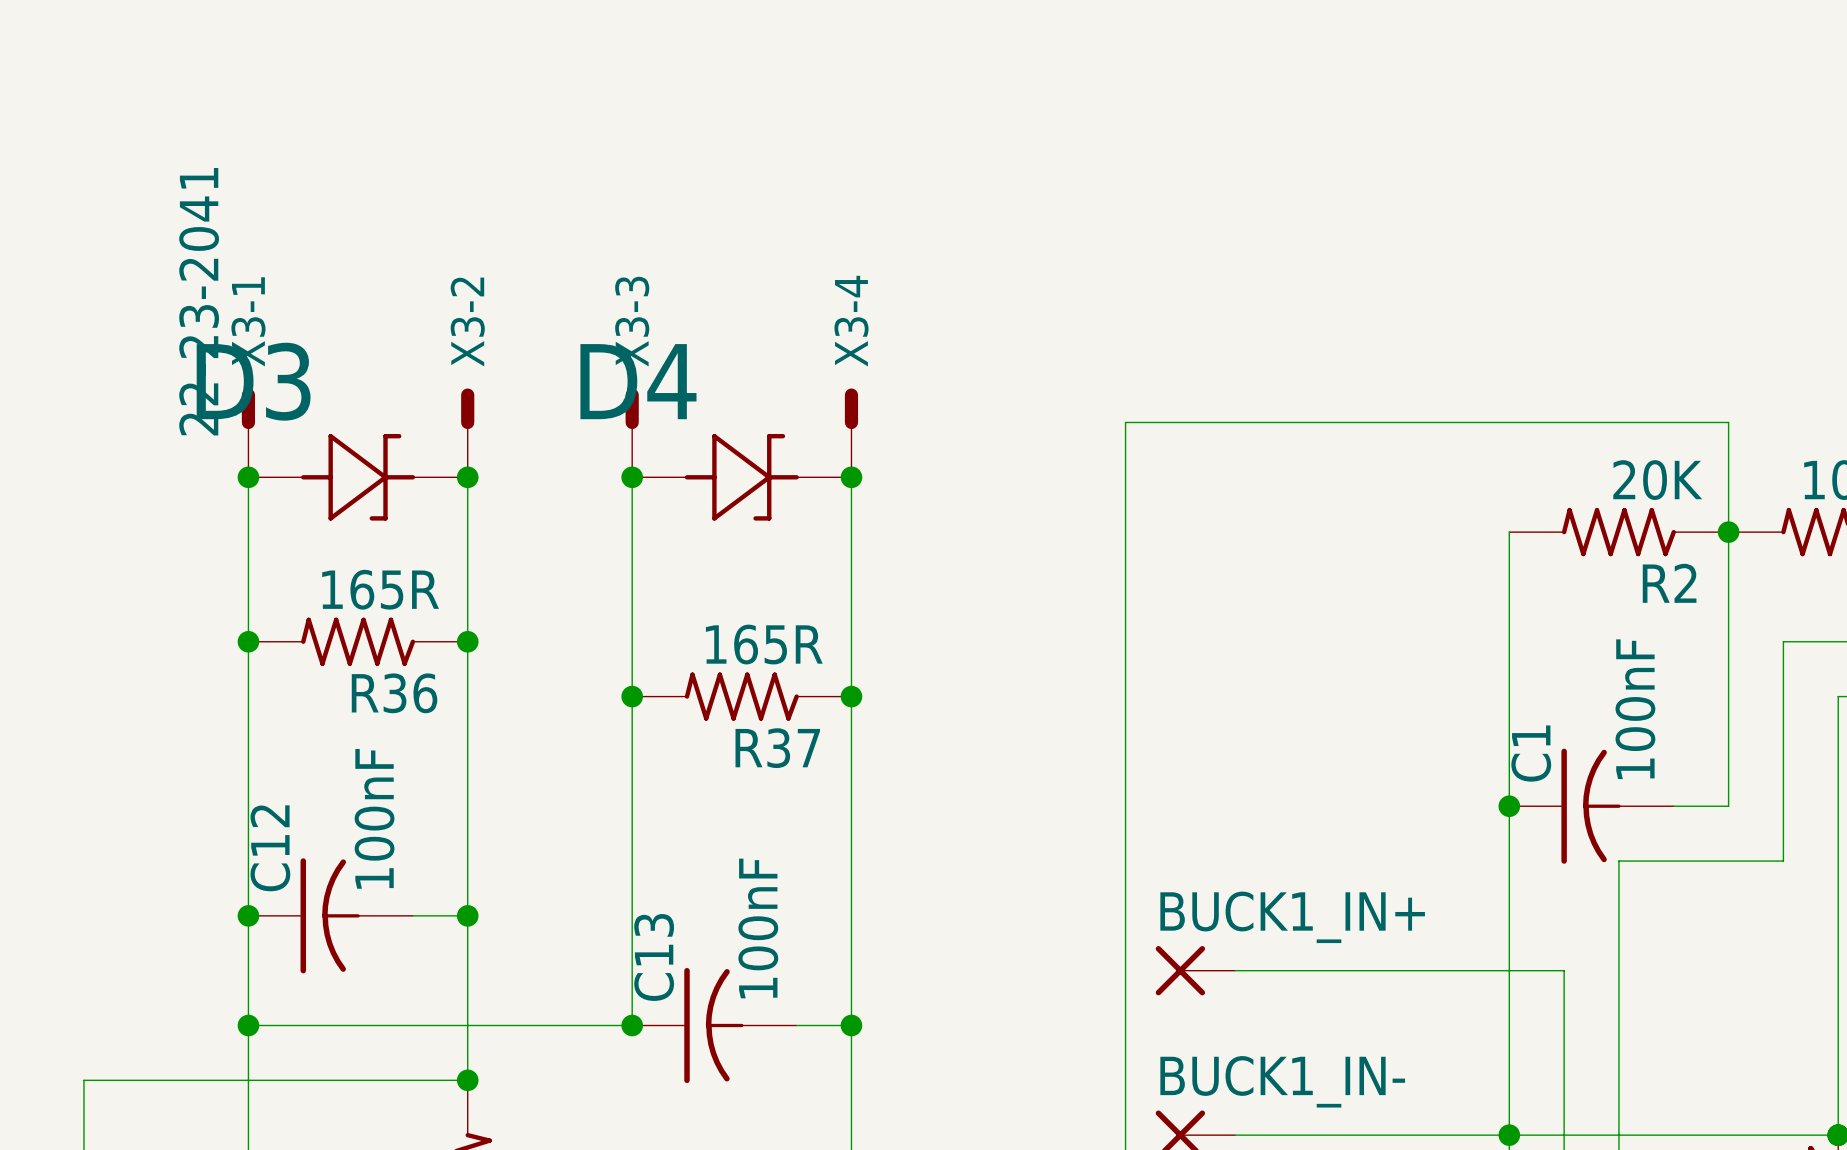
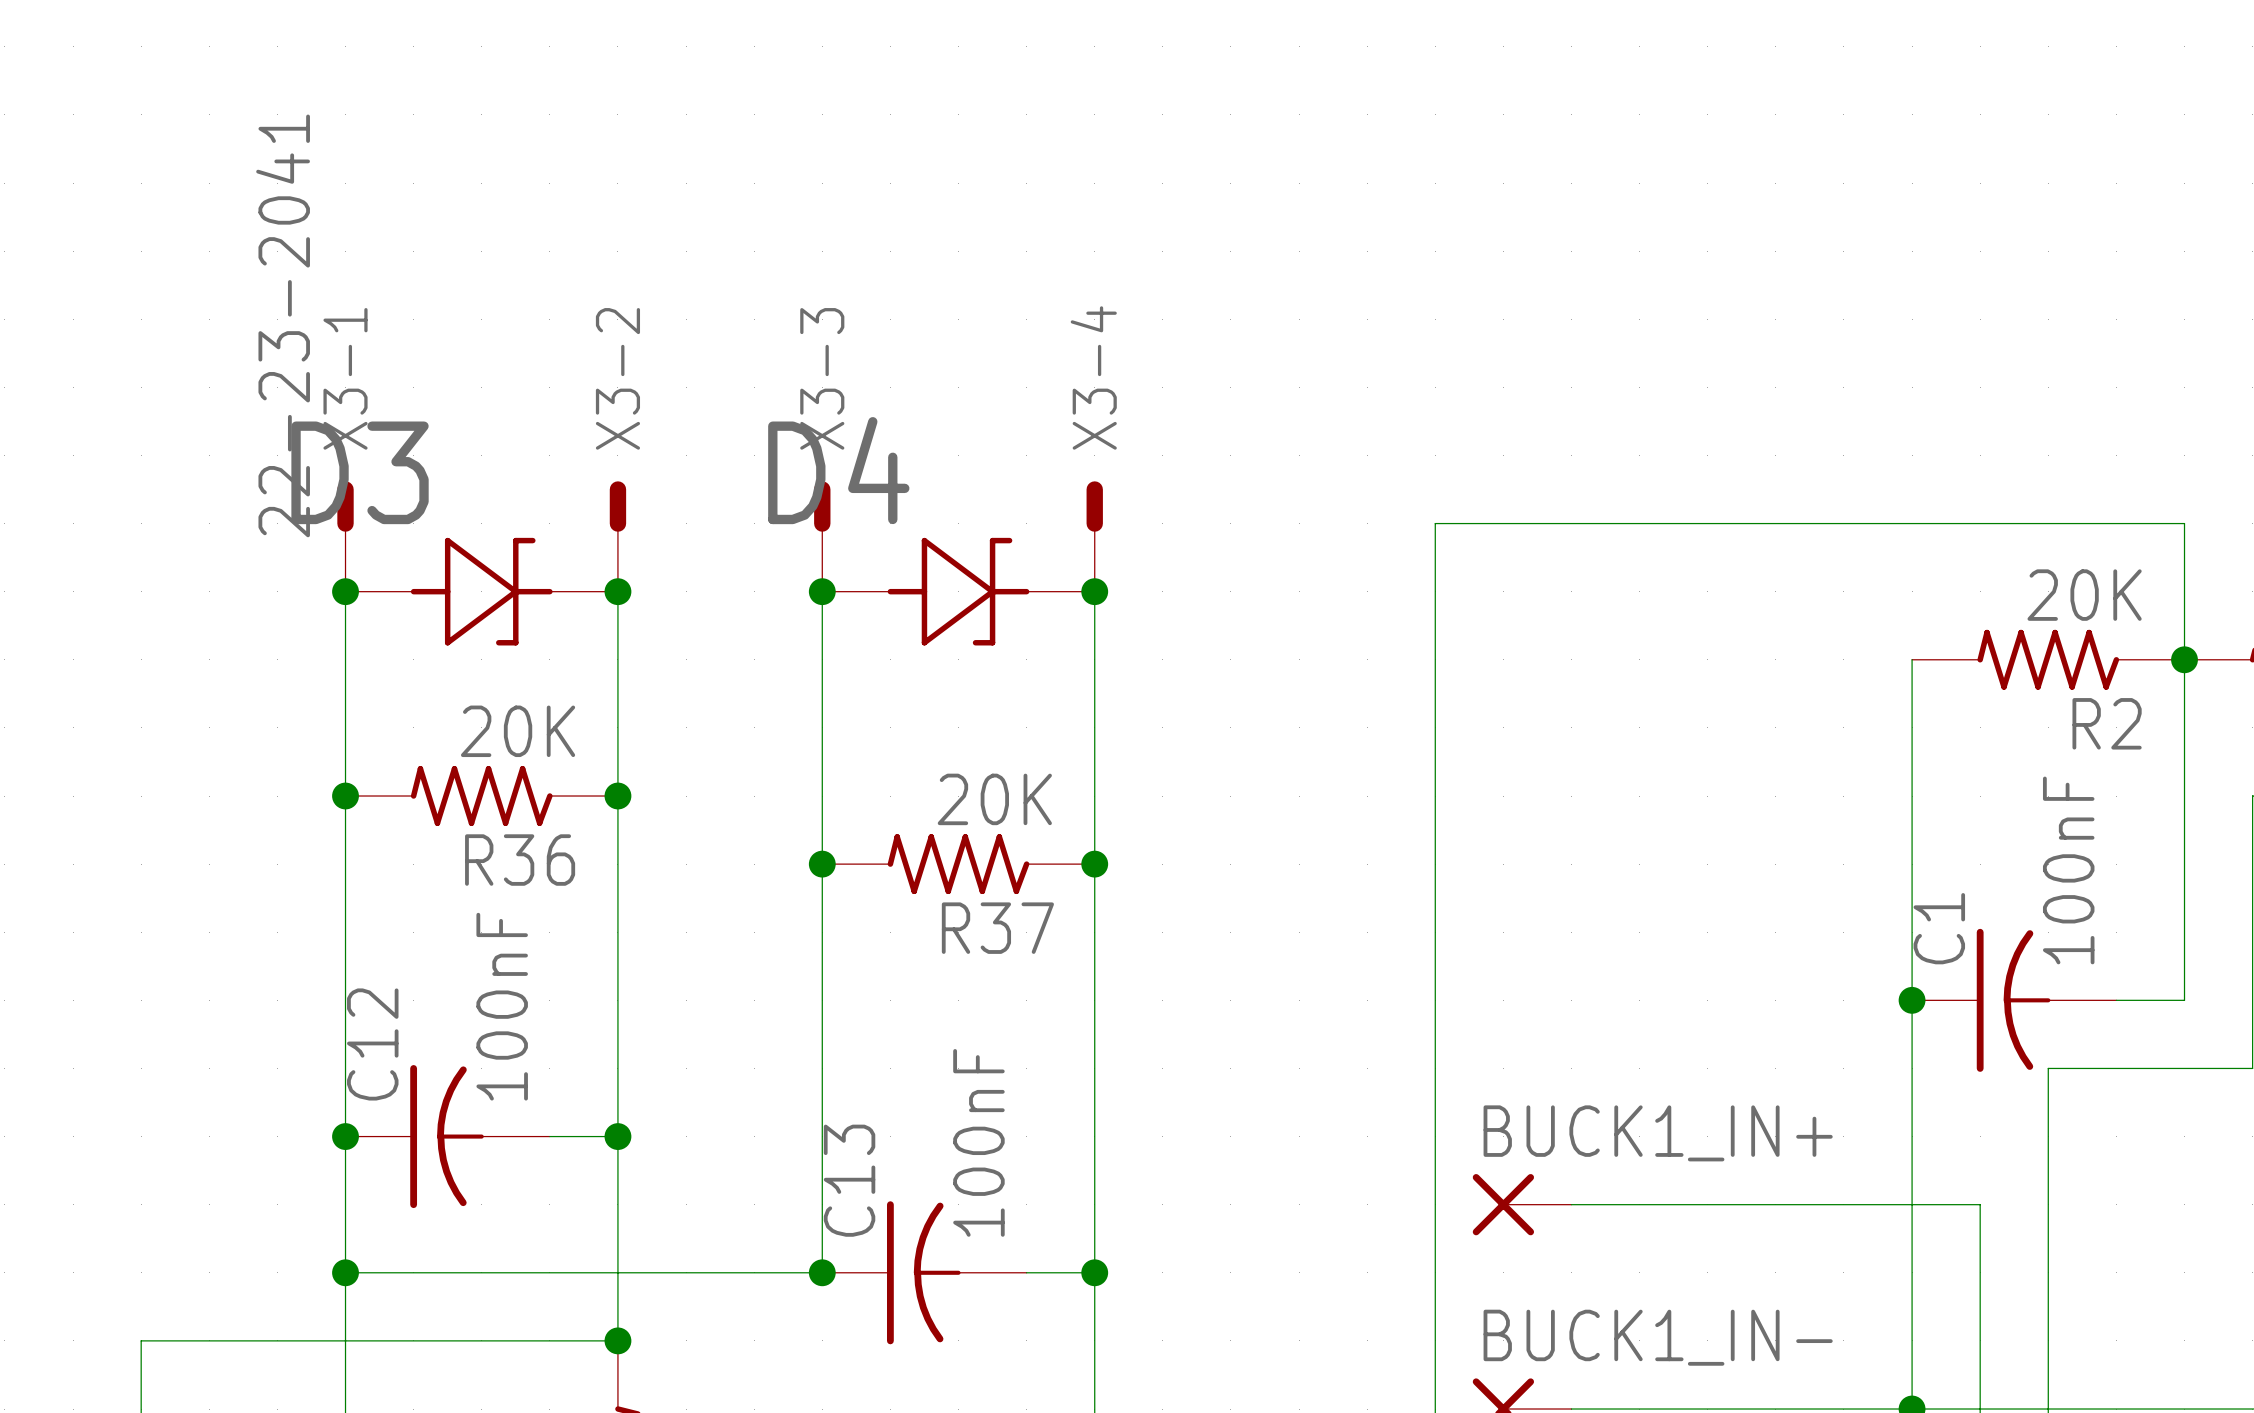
R36 value: 165R (380, 589) -> 20K (518, 731)
R37 value: 165R (764, 644) -> 20K (994, 799)

